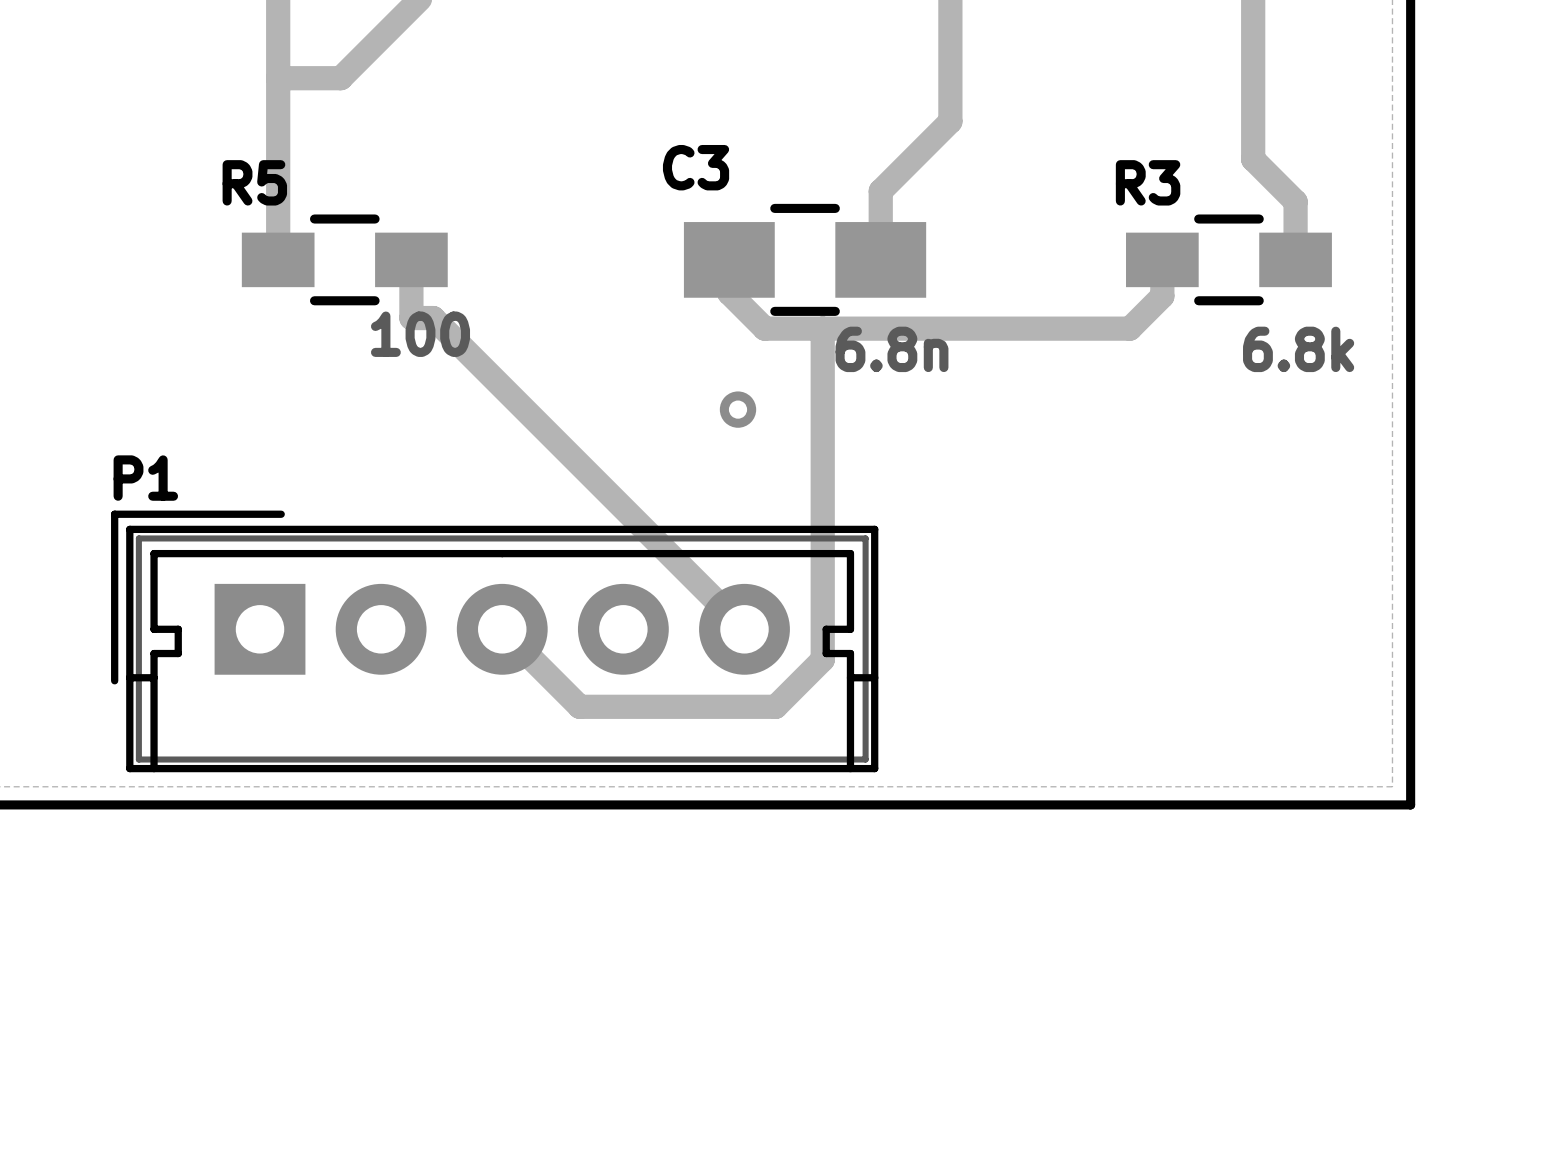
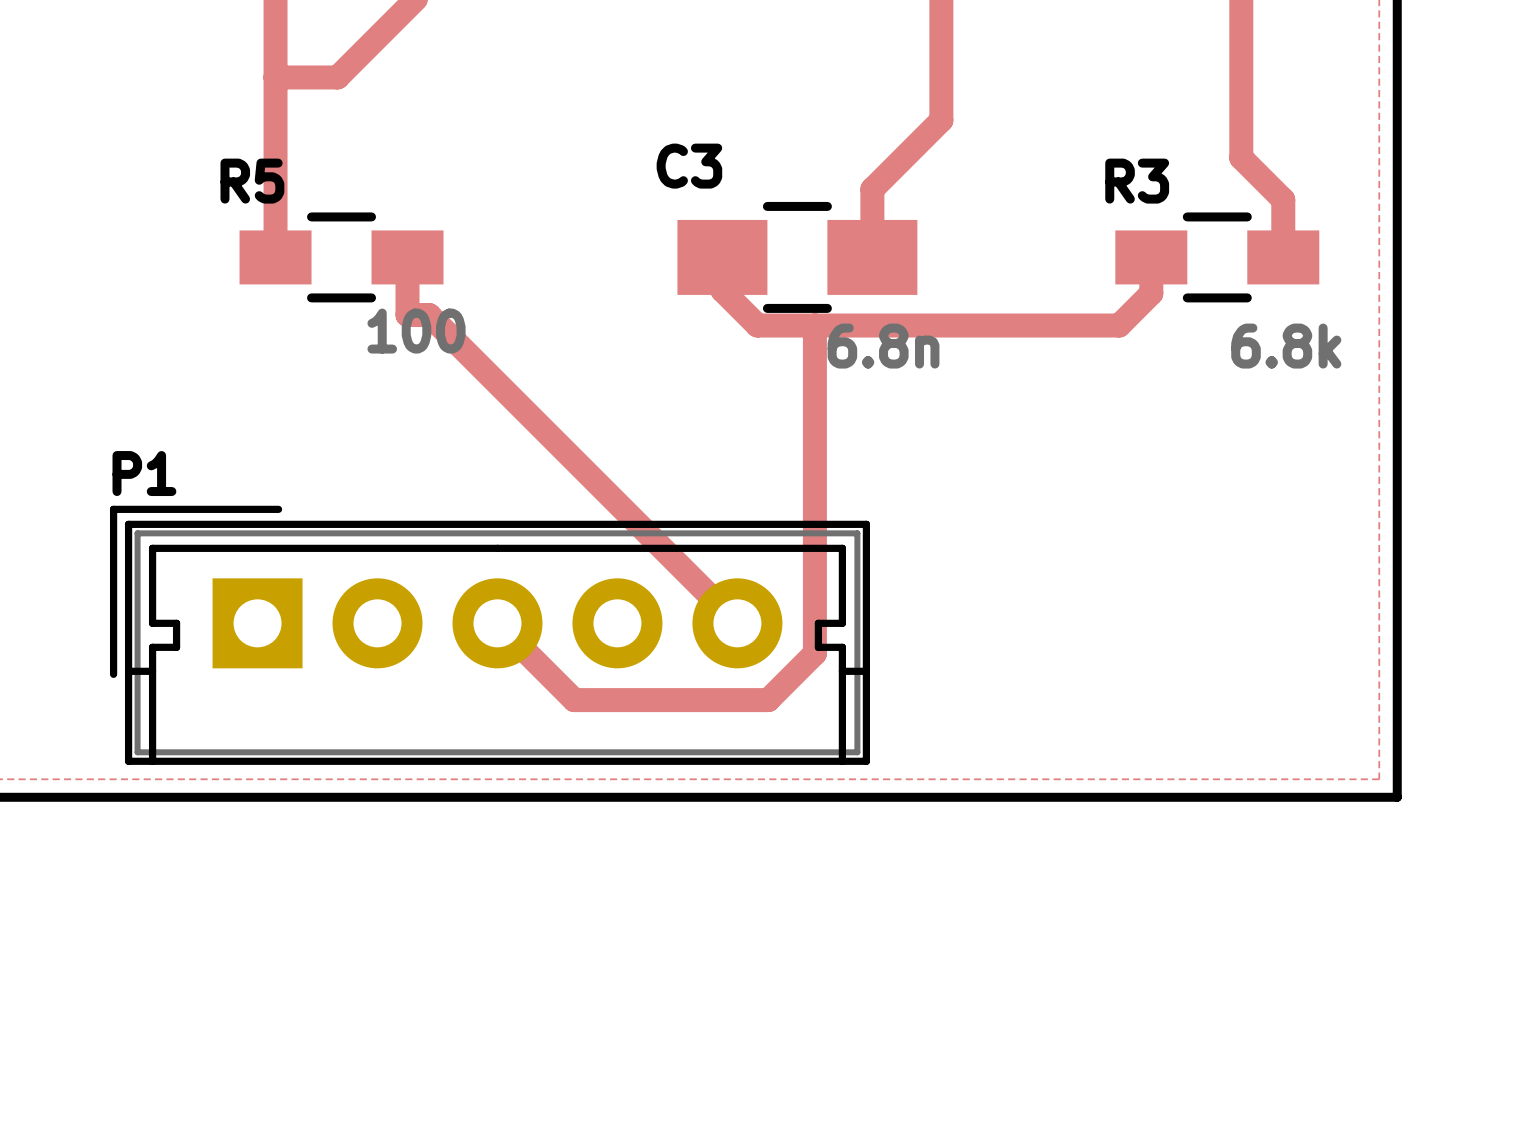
via: (738, 409) -> none

